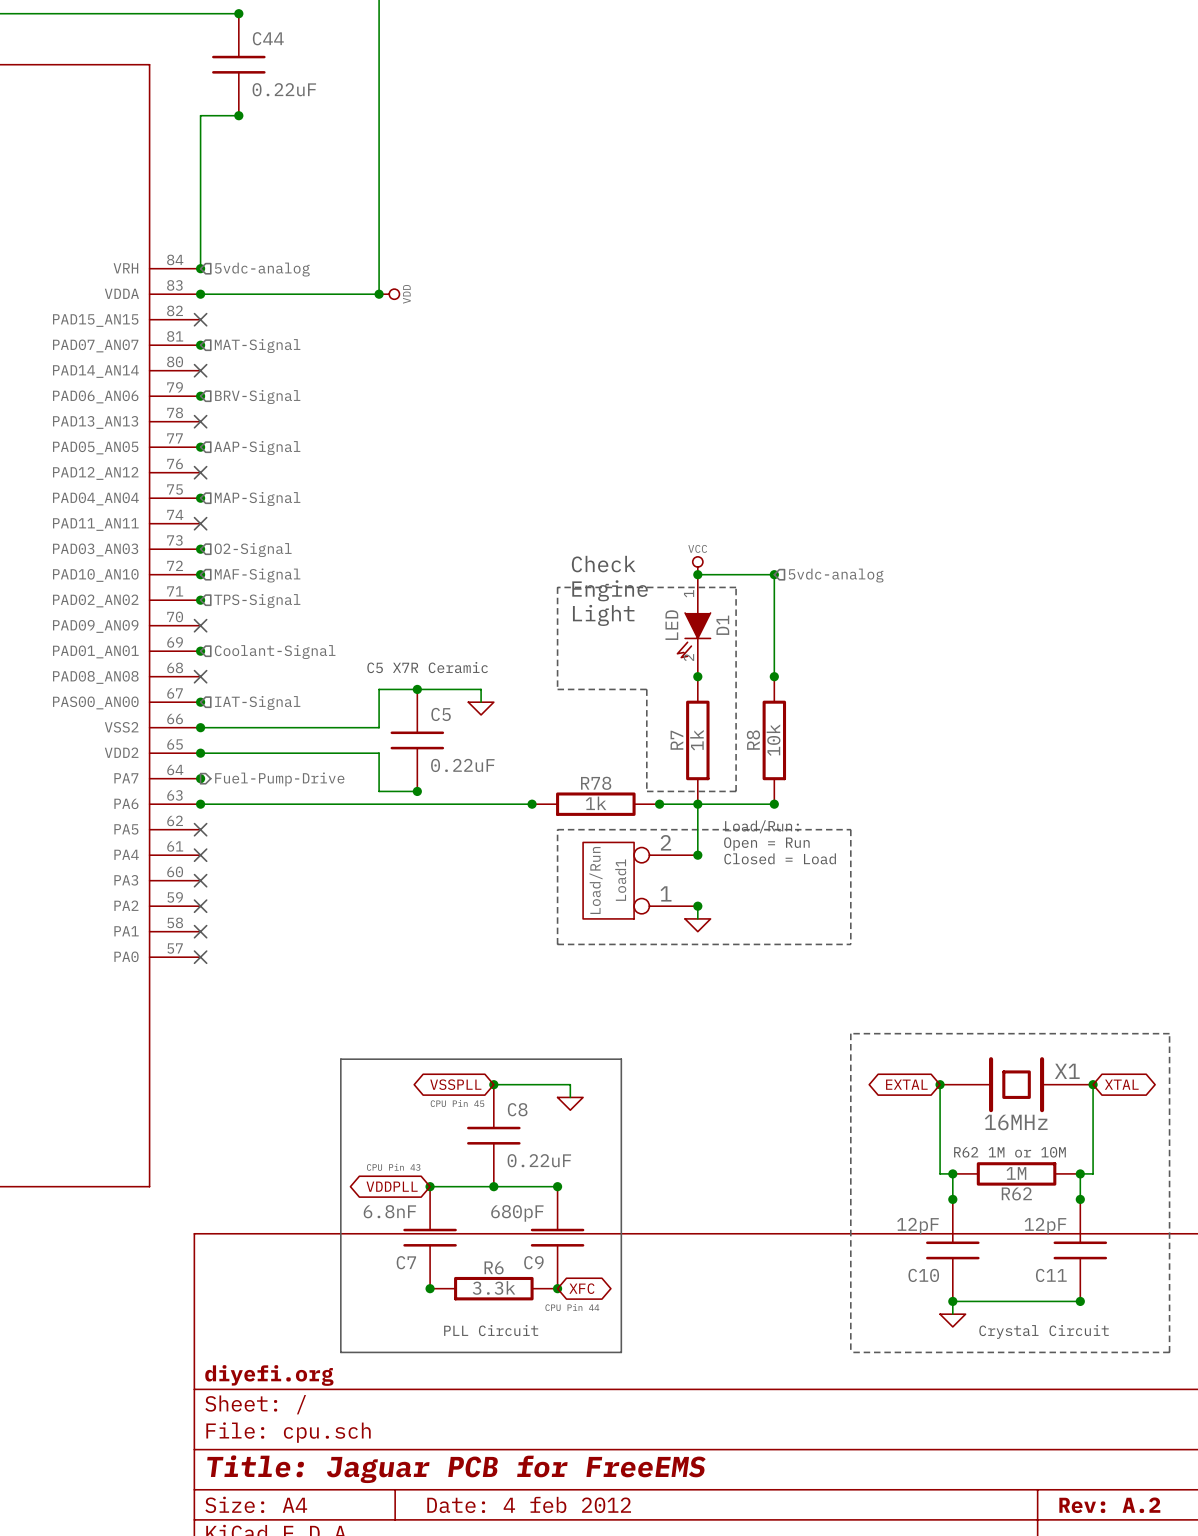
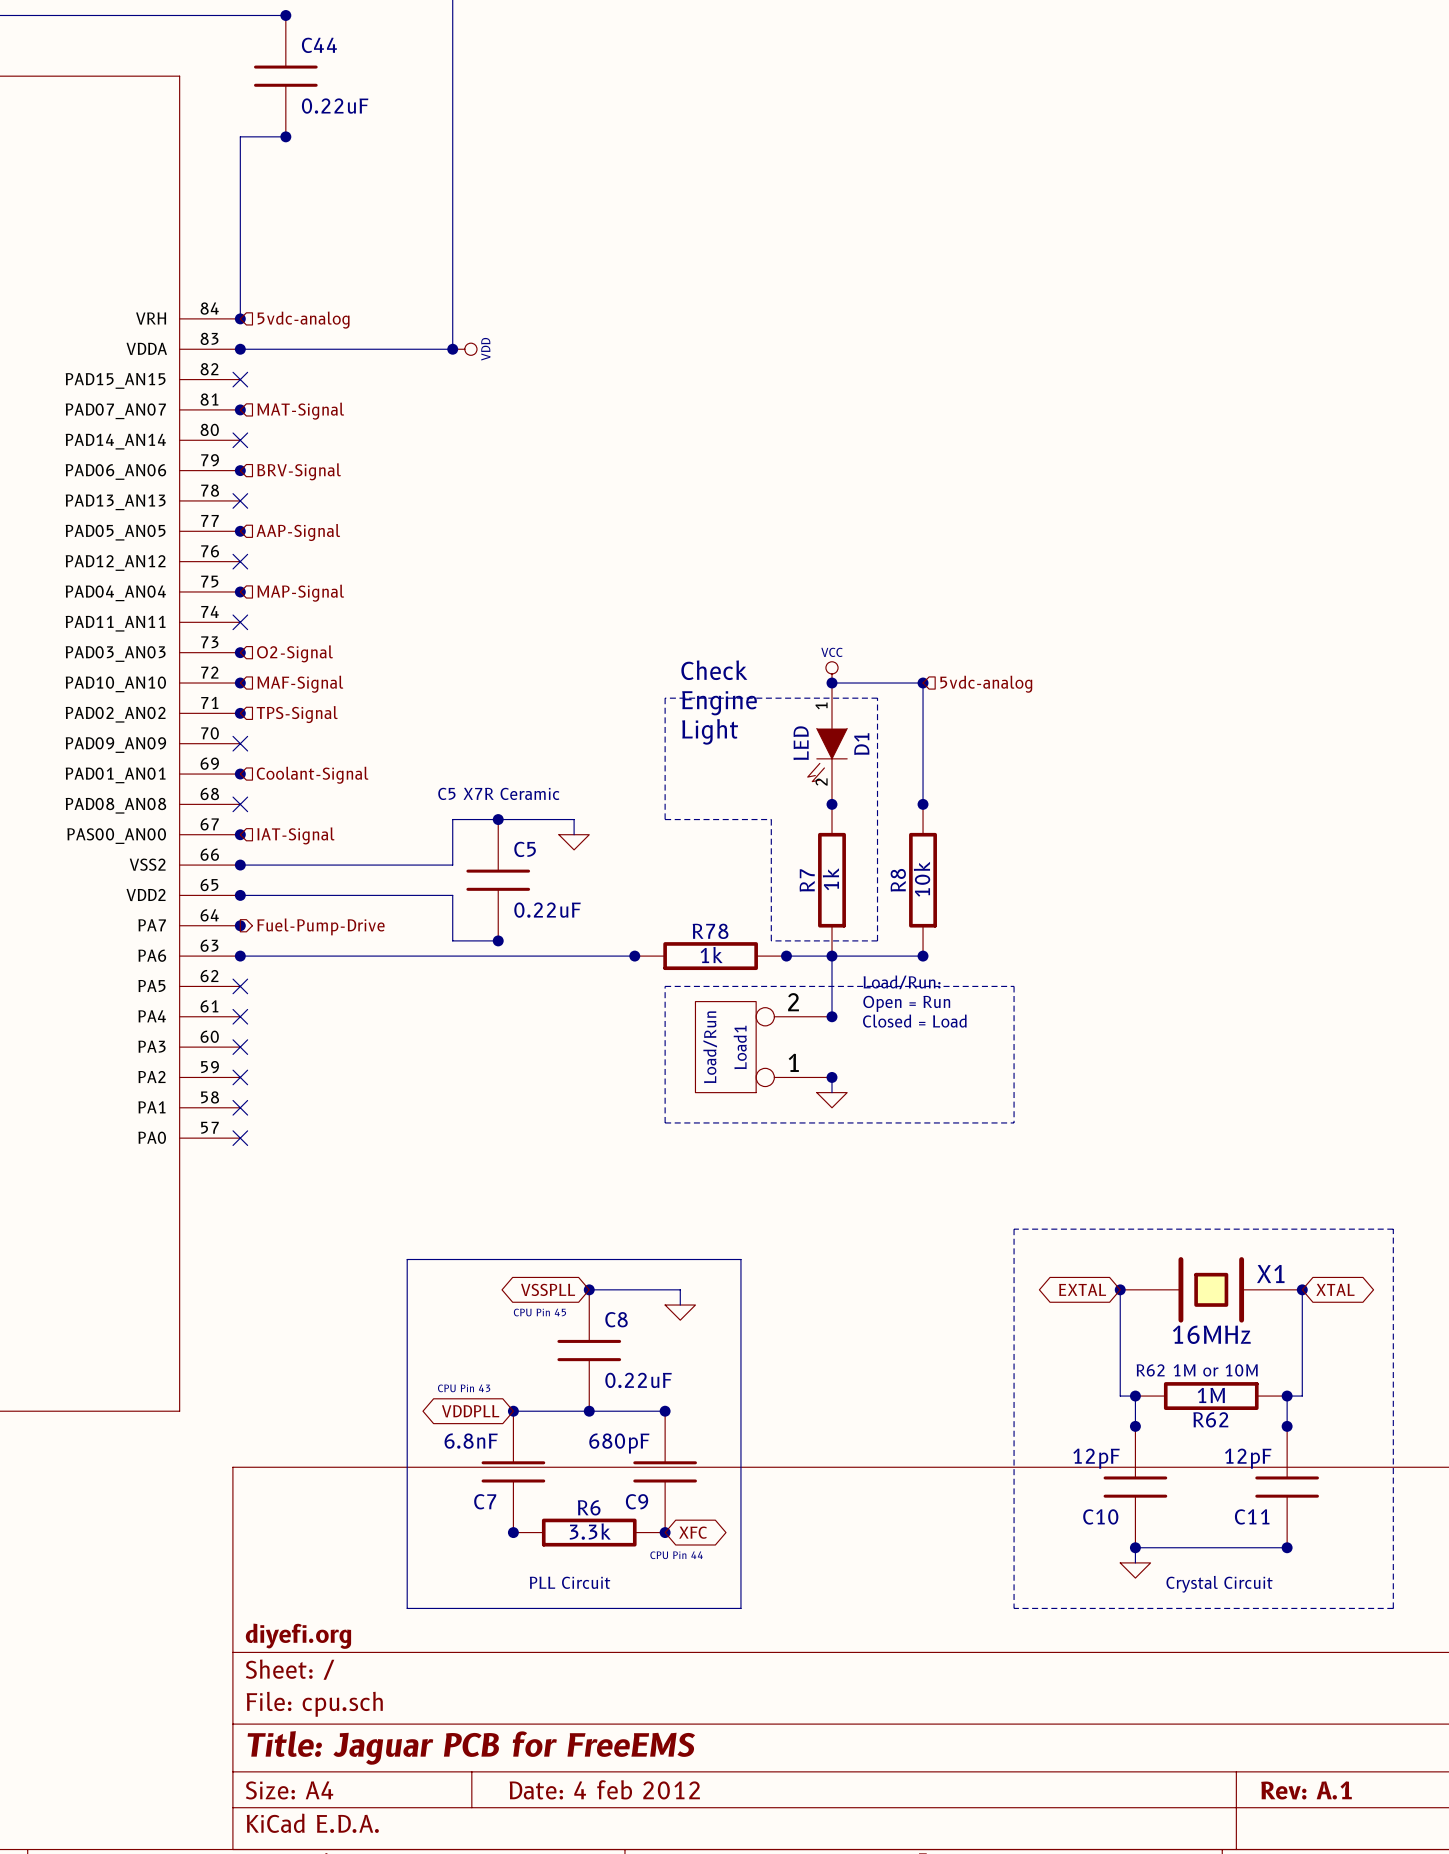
title block: Rev: A.2 (1109, 1505) -> Rev: A.1 (1306, 1790)

